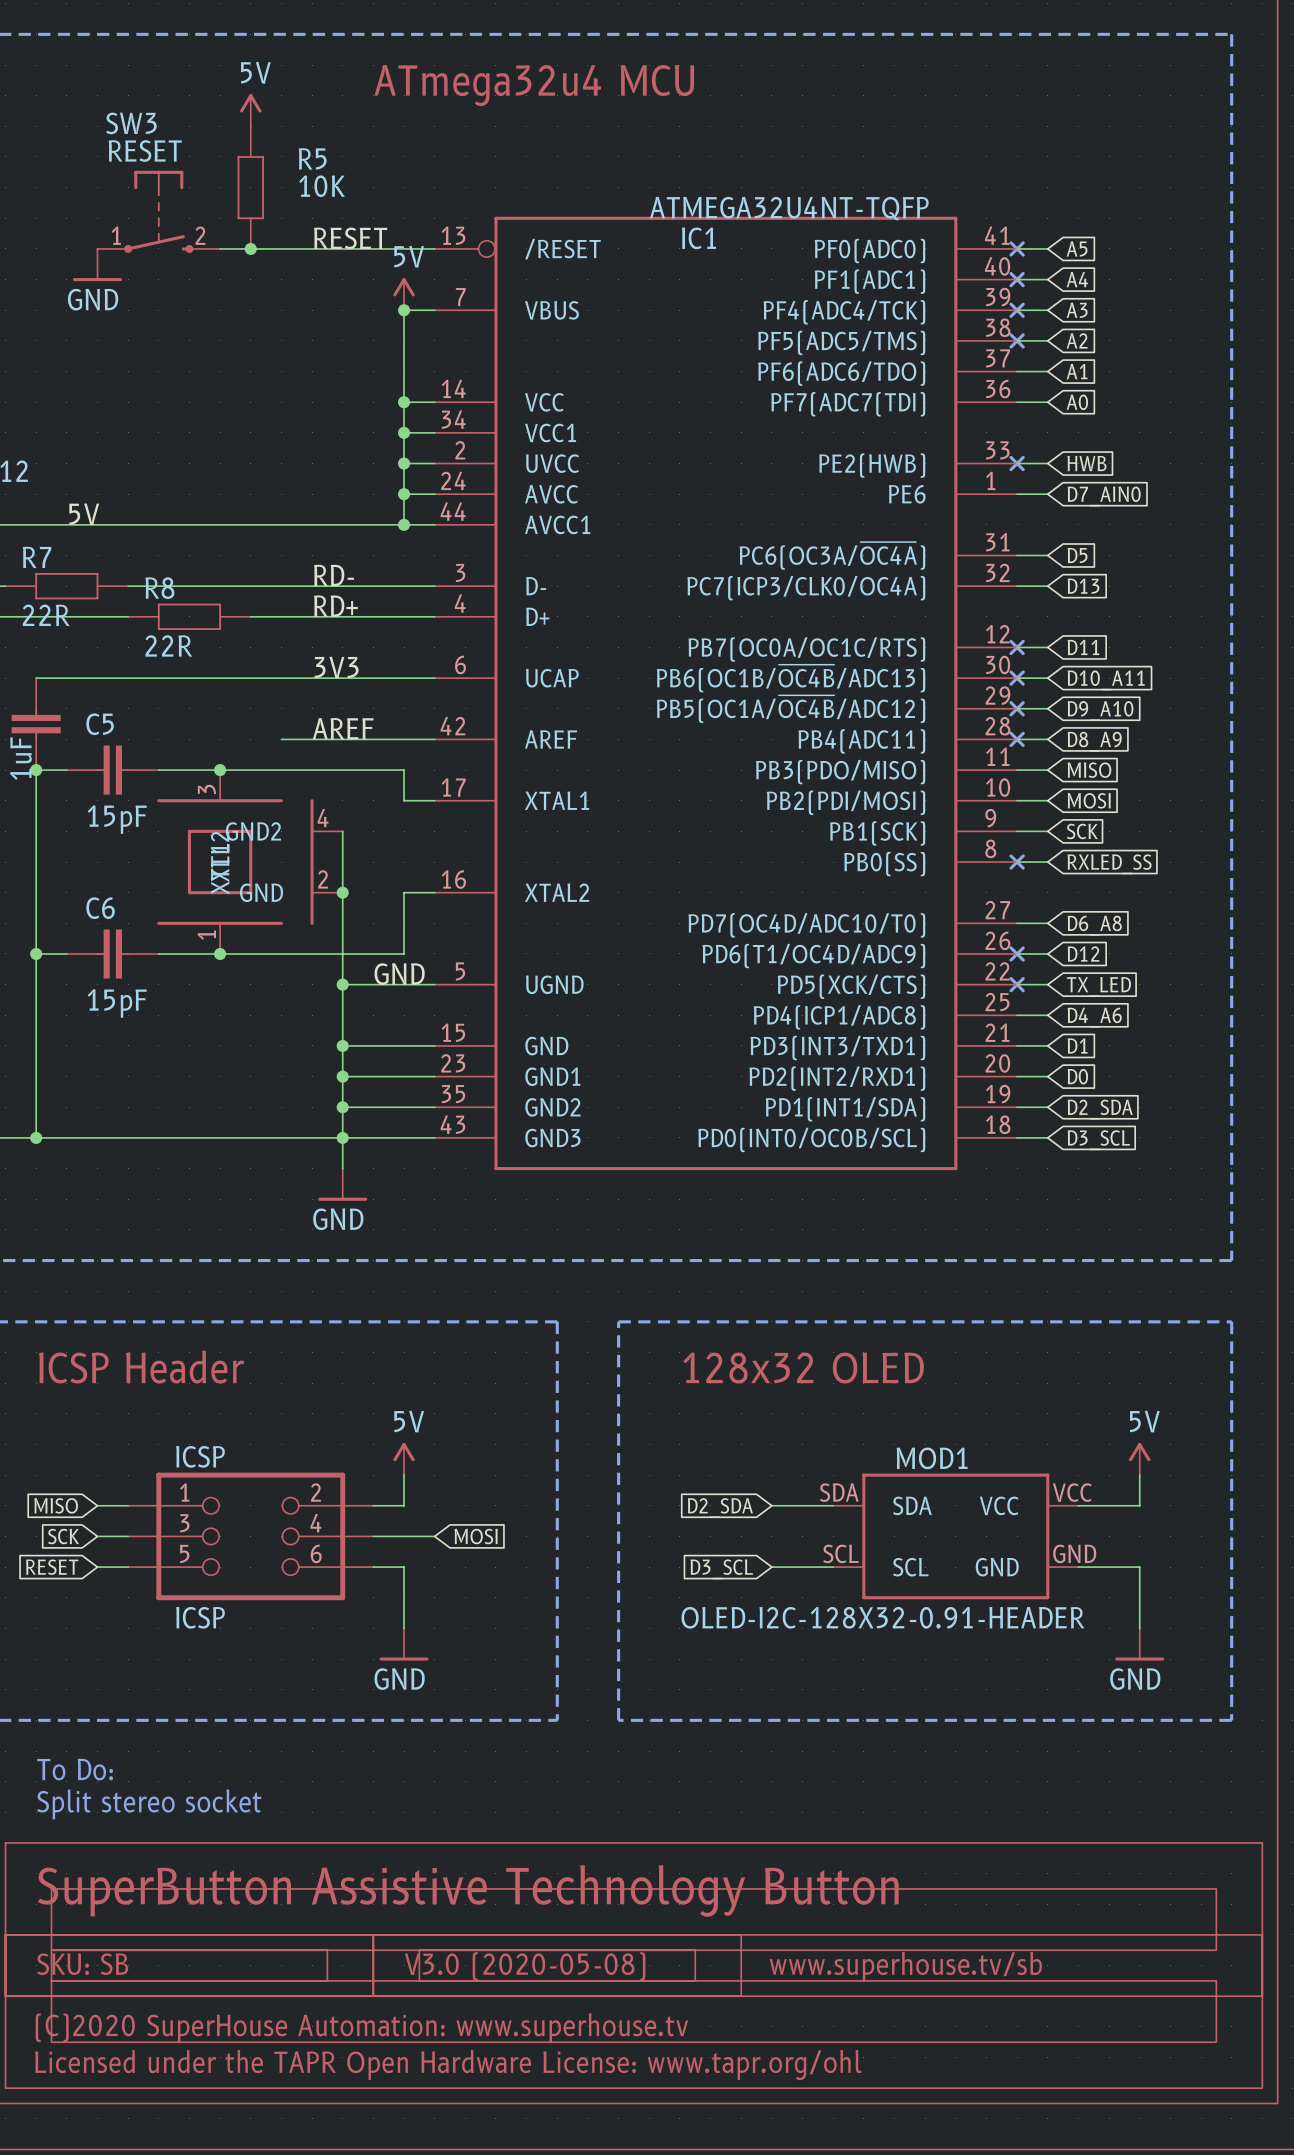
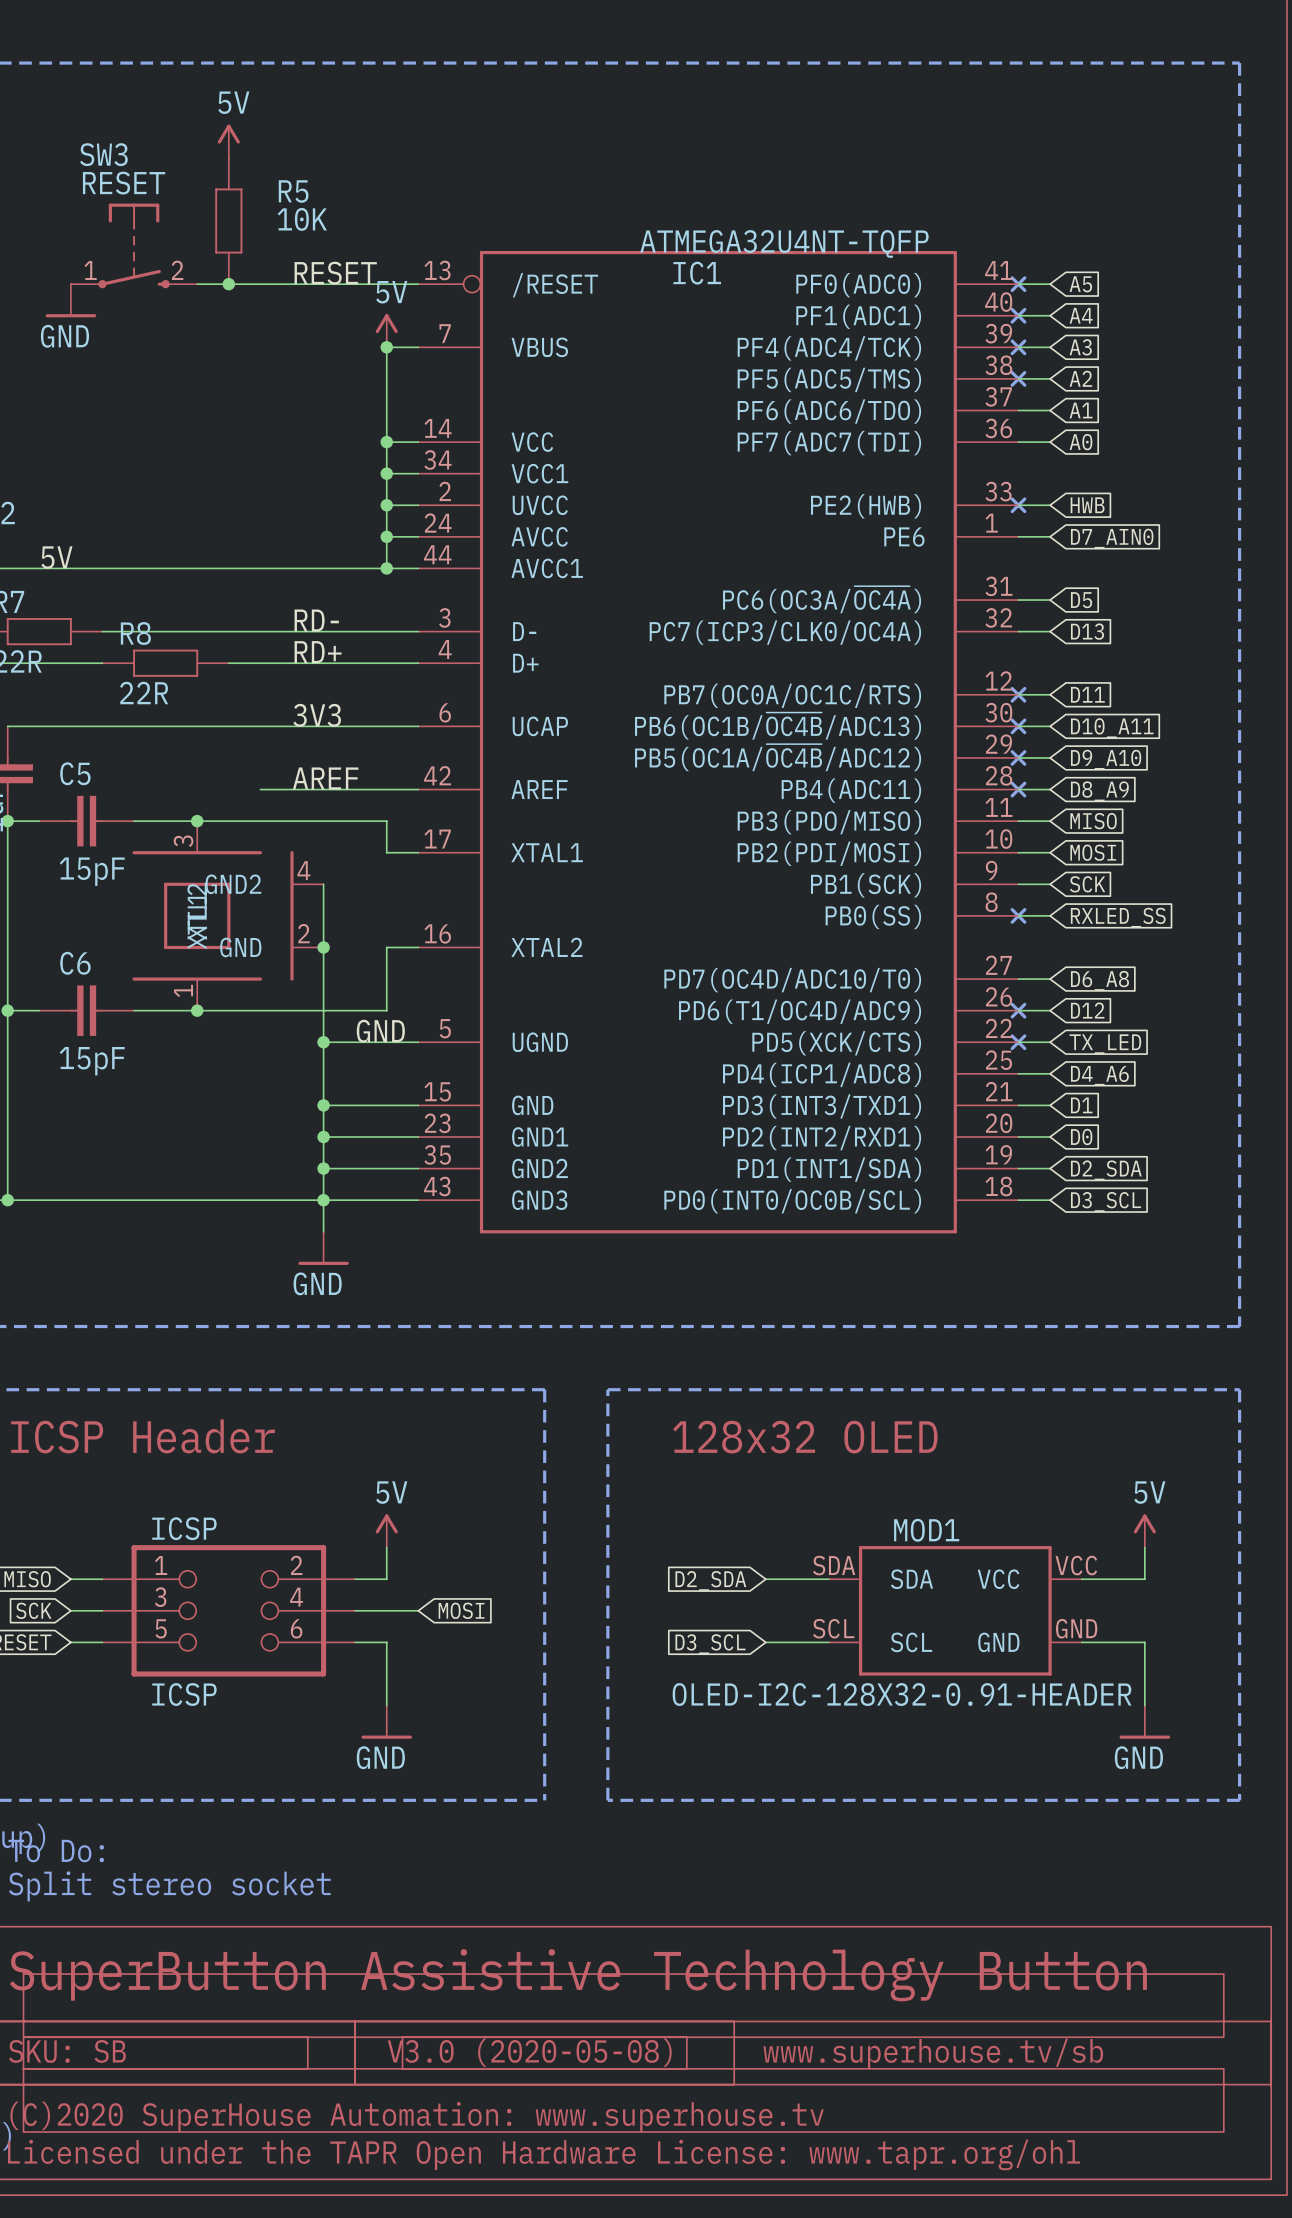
text: ATmega32u4 MCU (534, 85) -> none

